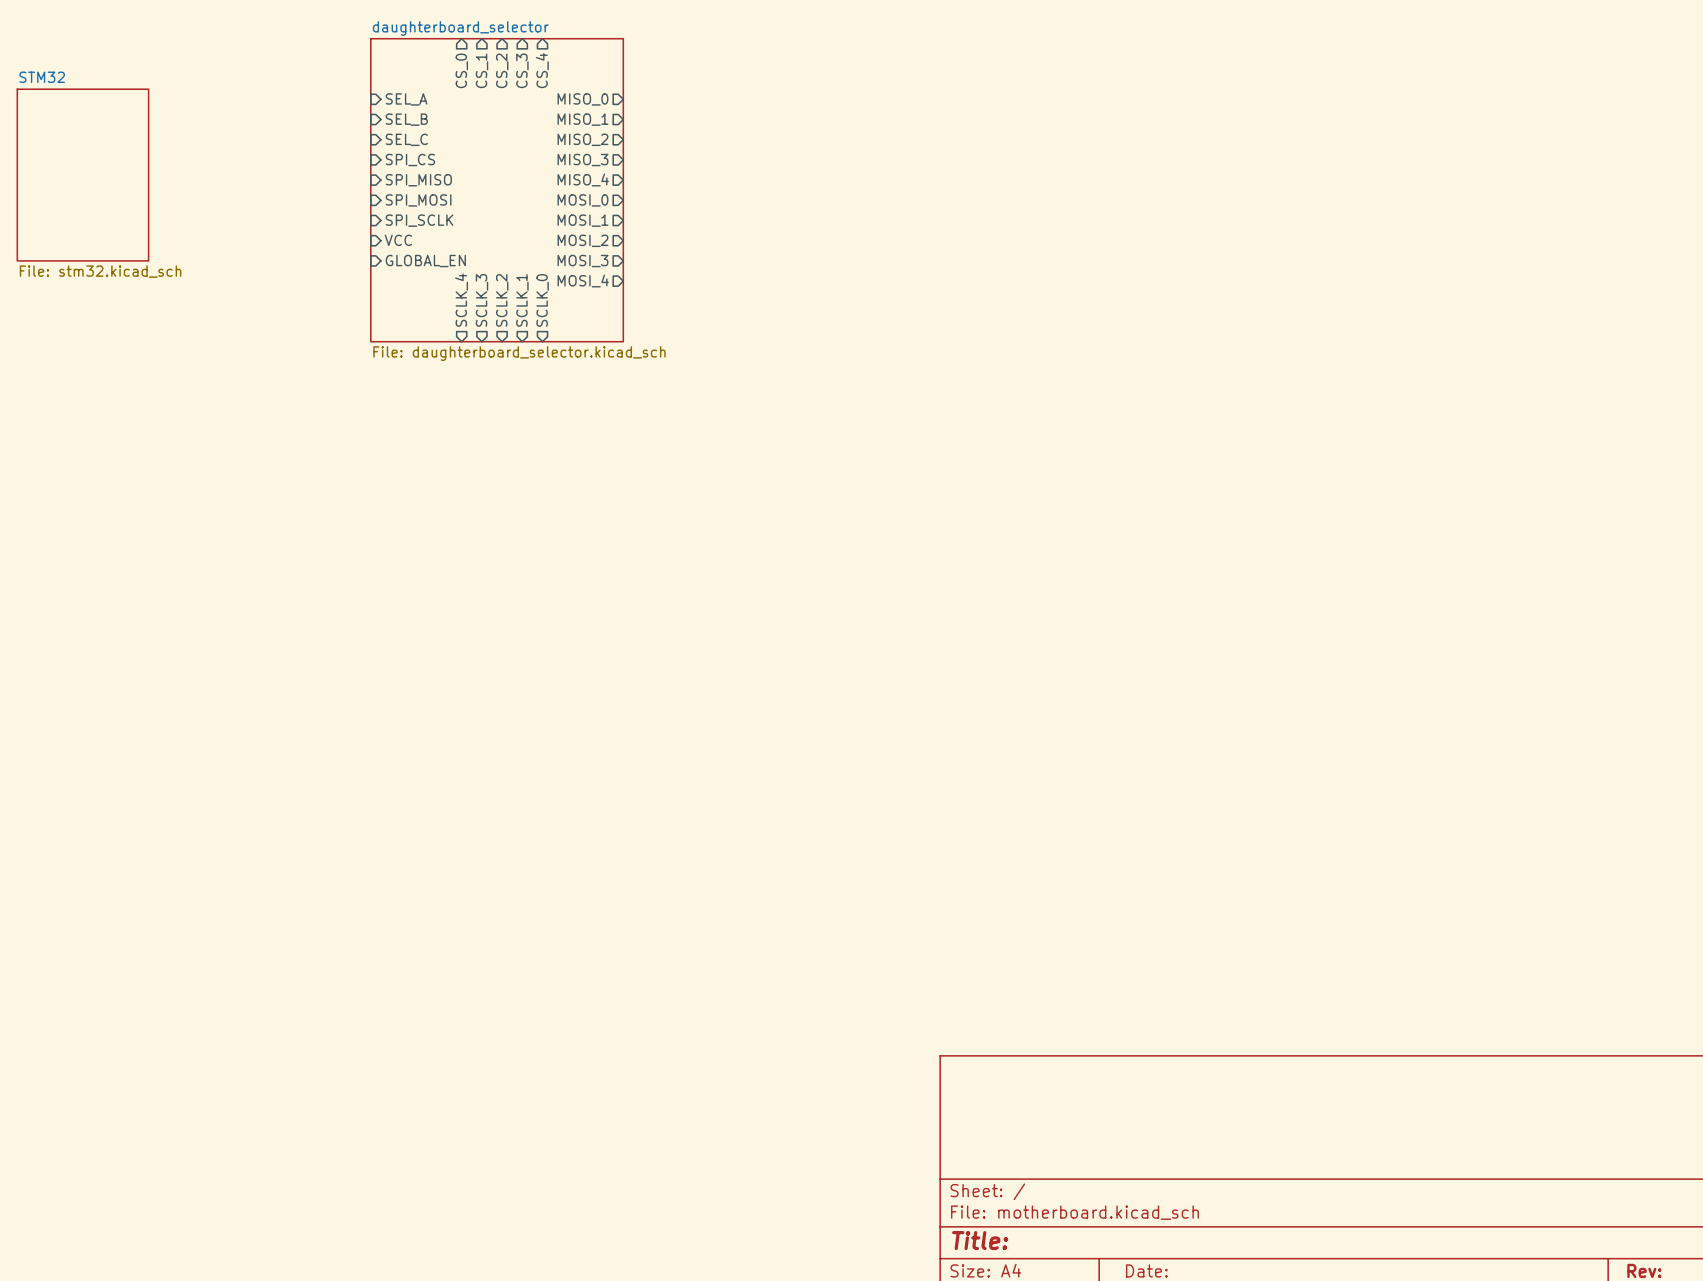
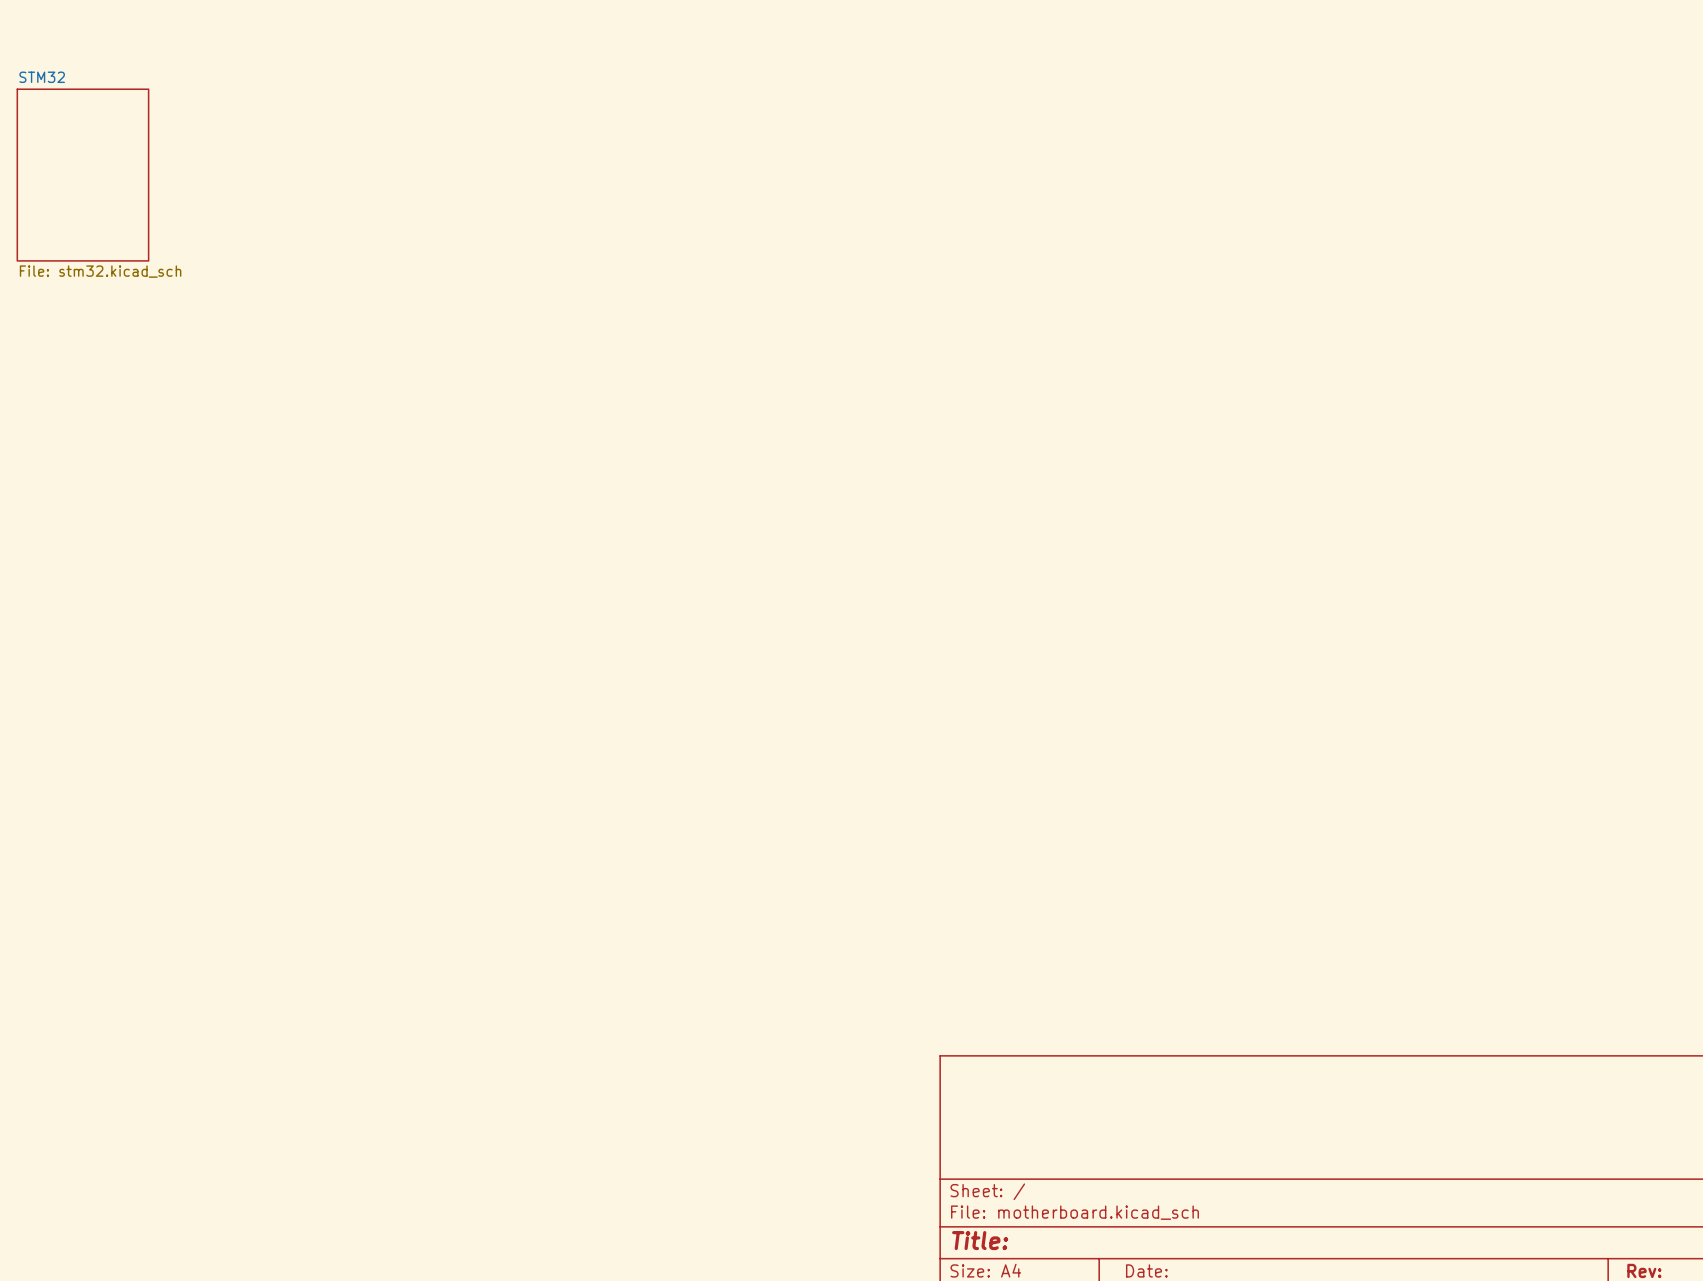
sheet pin: CS_0 (461, 70) -> none
sheet pin: CS_1 (482, 70) -> none
sheet pin: CS_2 (502, 70) -> none
sheet pin: CS_3 (522, 70) -> none
sheet pin: CS_4 (542, 70) -> none
sheet pin: SEL_A (406, 99) -> none
sheet pin: MISO_0 (582, 99) -> none
sheet pin: SEL_B (406, 119) -> none
sheet pin: MISO_1 (582, 119) -> none
sheet pin: SEL_C (406, 139) -> none
sheet pin: MISO_2 (582, 139) -> none
sheet pin: SPI_CS (410, 160) -> none
sheet pin: MISO_3 (582, 160) -> none
sheet pin: MISO_4 (583, 179) -> none
sheet pin: SPI_MISO (418, 180) -> none
sheet daughterboard_selector: File: daughterboard_selector.kicad_sch (497, 190) -> none
sheet pin: SPI_MOSI (418, 200) -> none
sheet pin: MOSI_0 (582, 200) -> none
sheet pin: SPI_SCLK (419, 220) -> none
sheet pin: MOSI_1 (582, 220) -> none
sheet pin: VCC (398, 240) -> none
sheet pin: MOSI_2 (582, 240) -> none
sheet pin: GLOBAL_EN (425, 261) -> none
sheet pin: MOSI_3 (582, 261) -> none
sheet pin: MOSI_4 (583, 280) -> none
sheet pin: SCLK_4 (461, 300) -> none
sheet pin: SCLK_3 (482, 300) -> none
sheet pin: SCLK_2 (502, 300) -> none
sheet pin: SCLK_1 (522, 300) -> none
sheet pin: SCLK_0 (542, 300) -> none

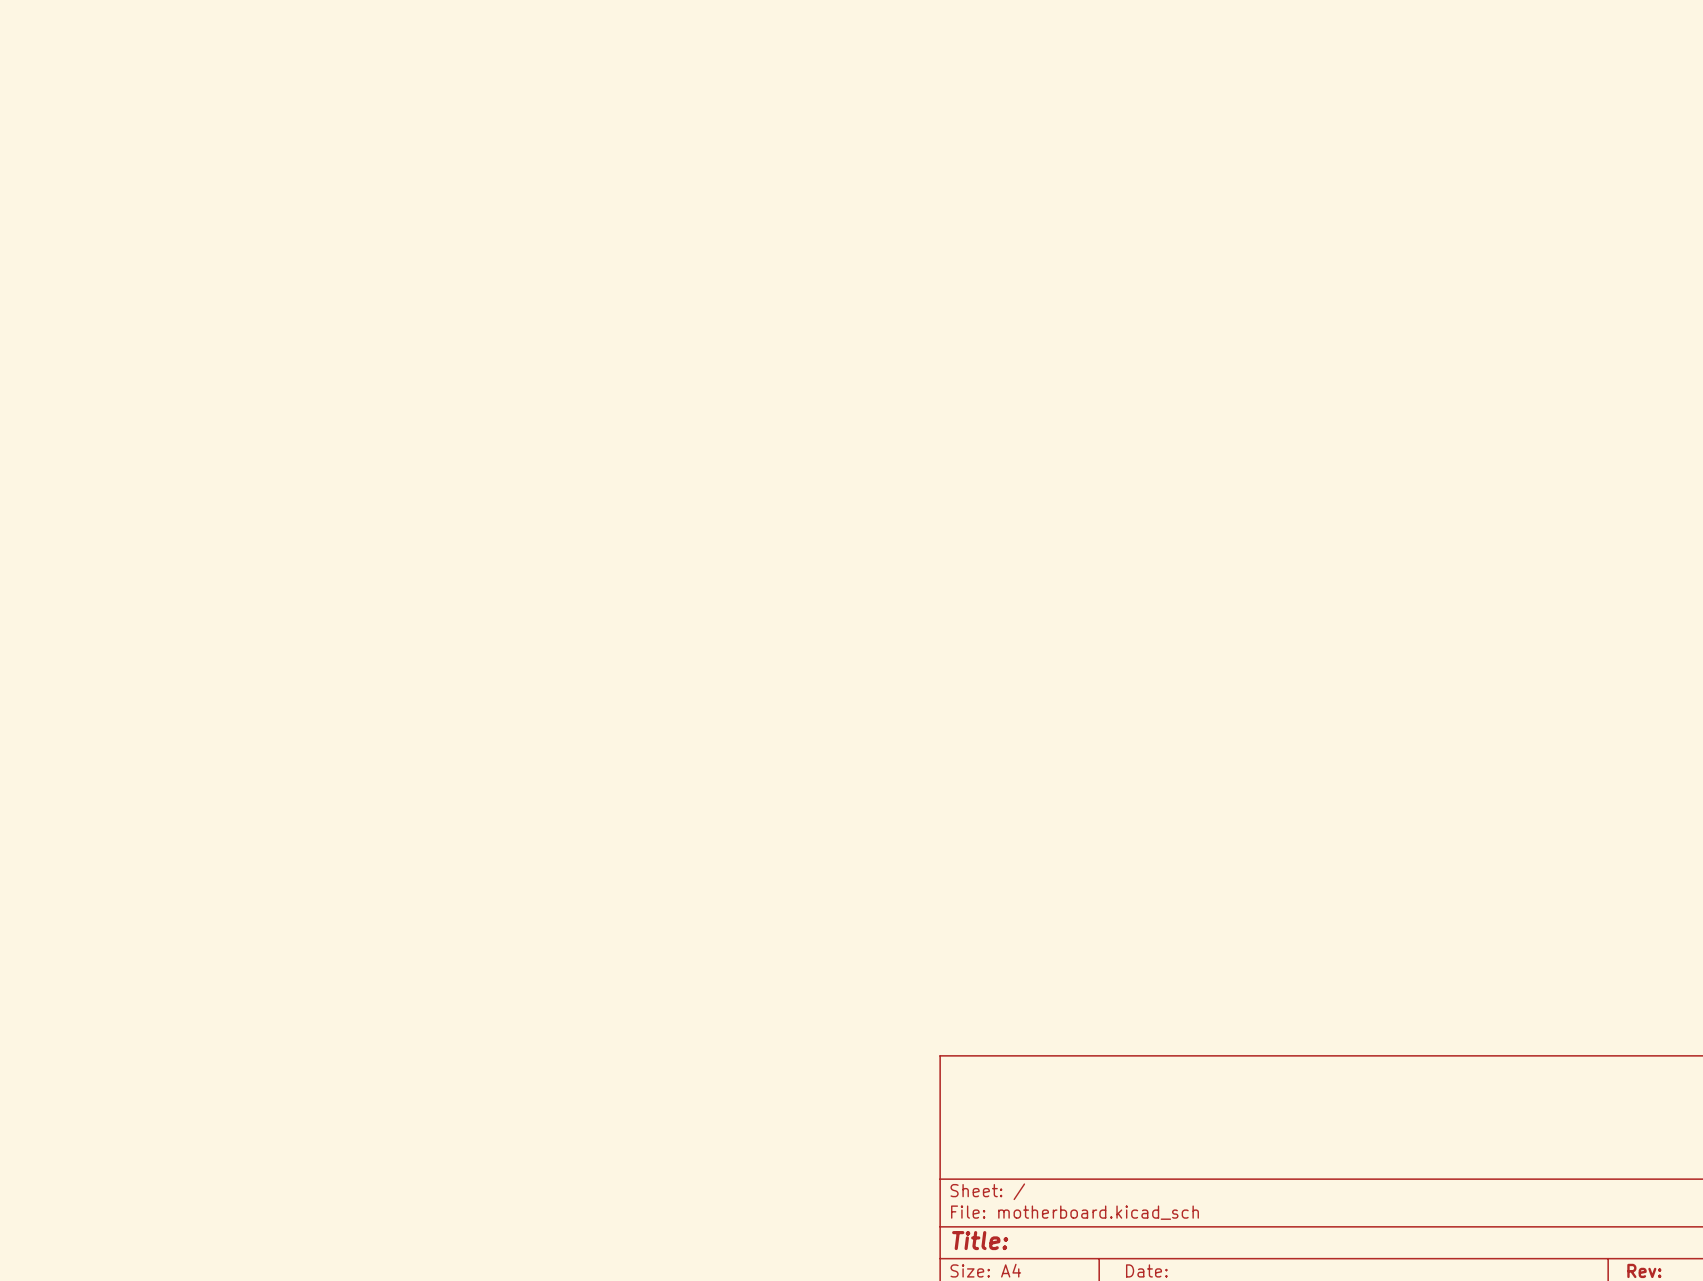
sheet STM32: File: stm32.kicad_sch (82, 175) -> none

